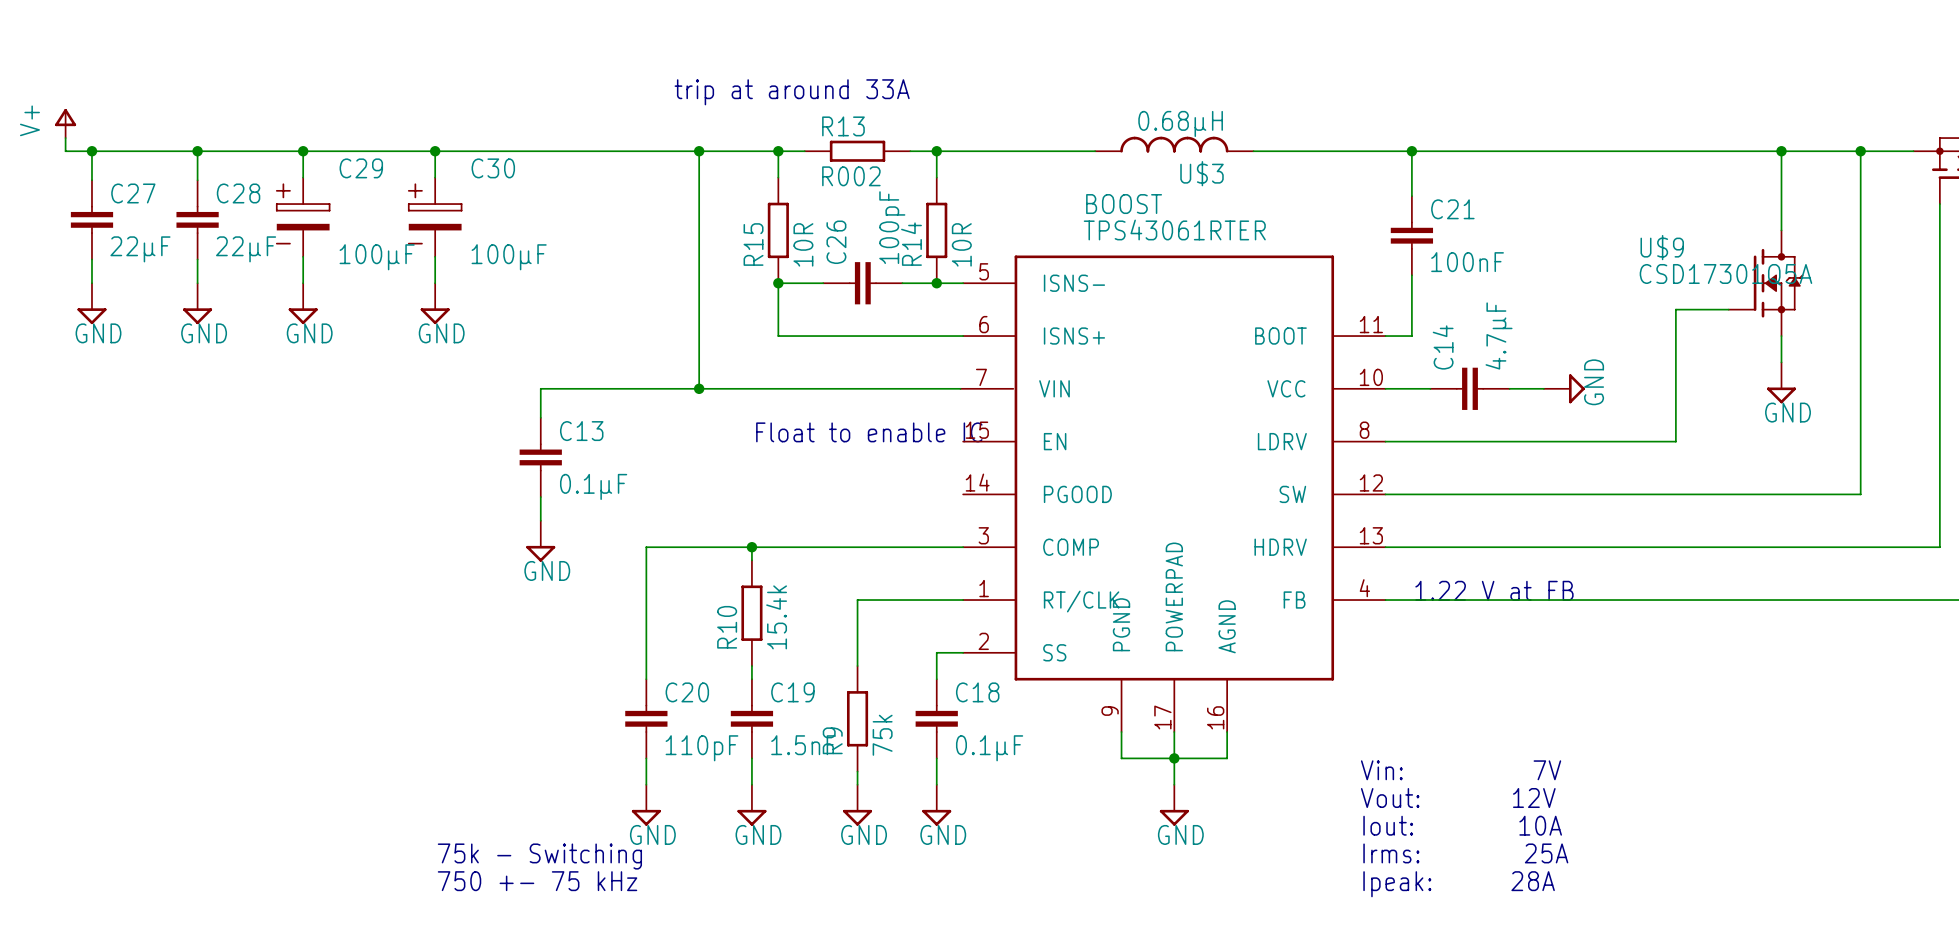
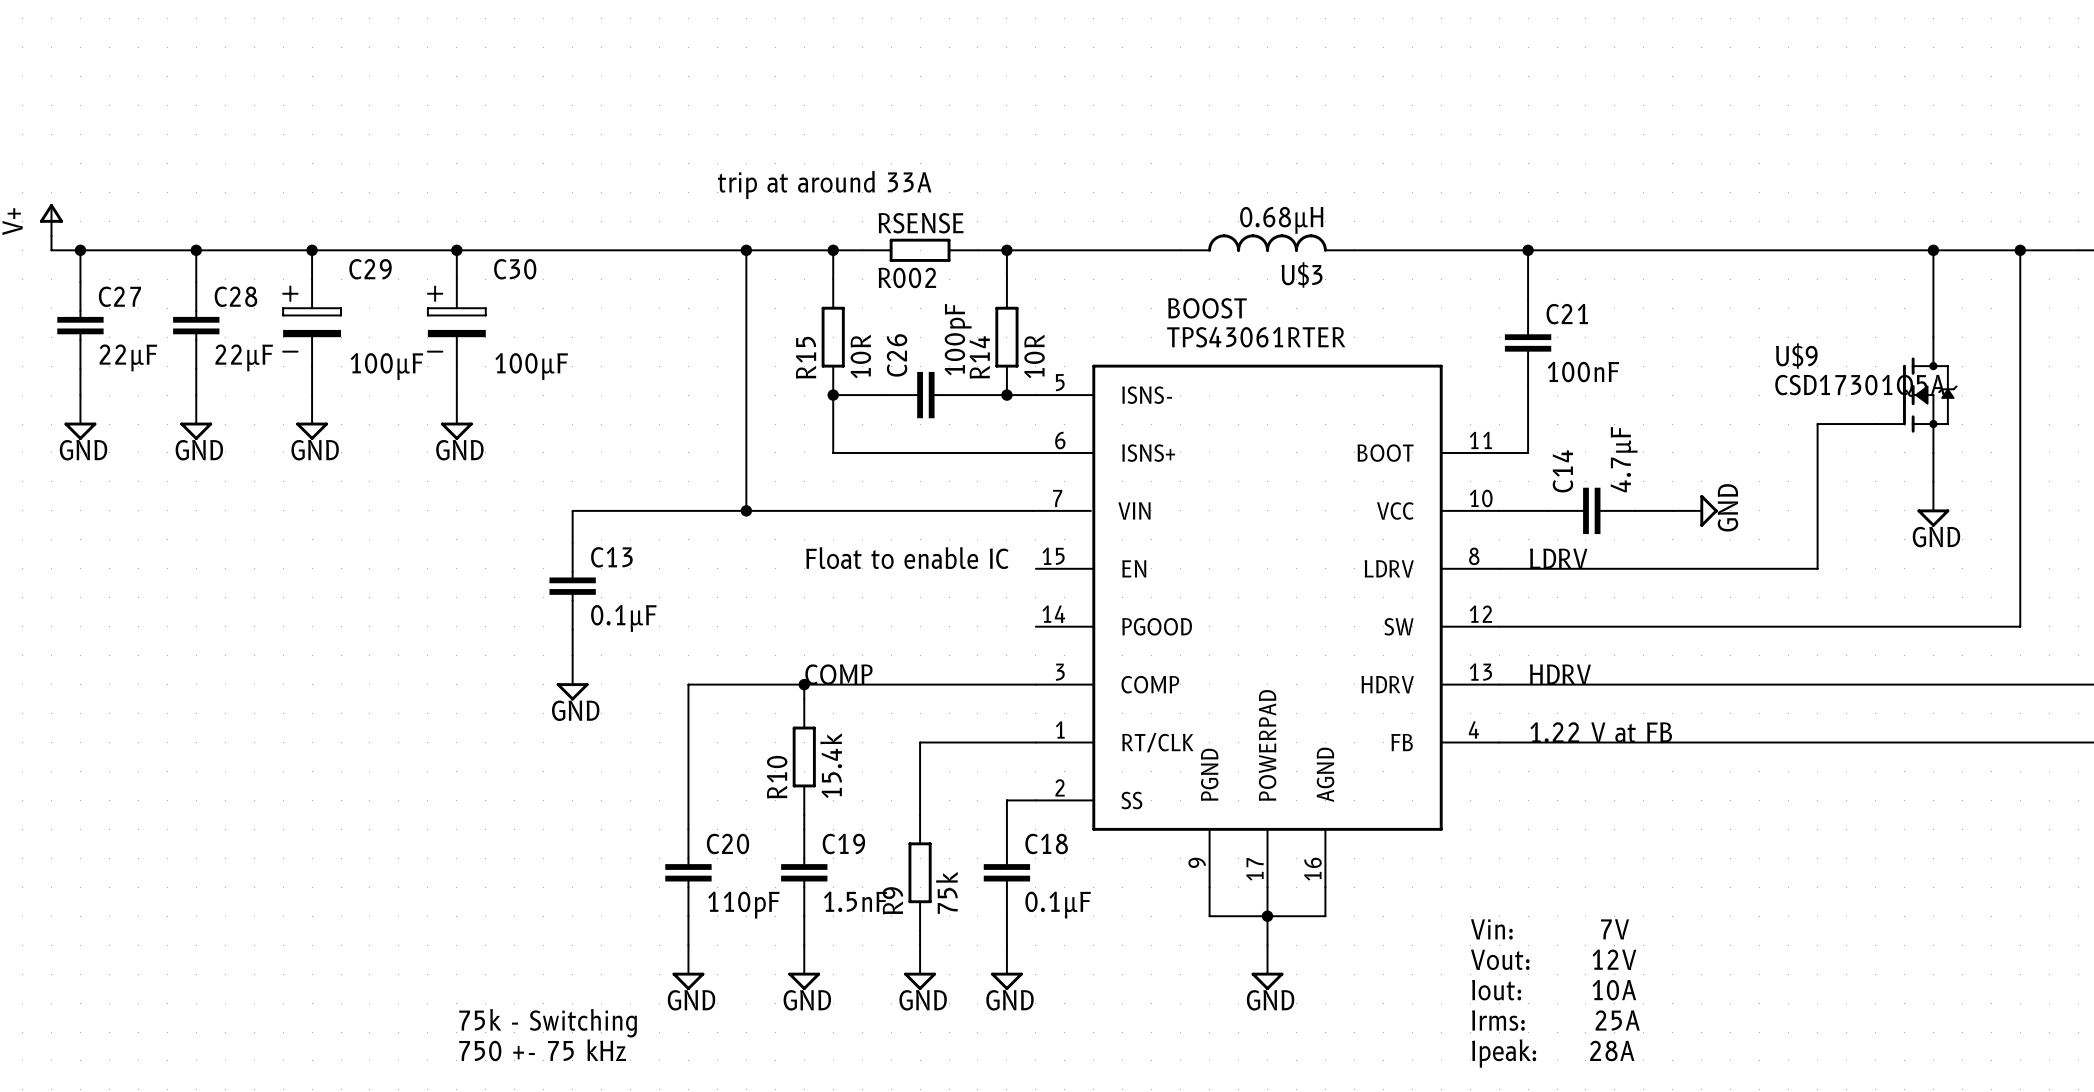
R13 name: R13 (843, 126) -> RSENSE (921, 223)
label: none -> LDRV (1558, 558)
label: none -> COMP (838, 674)
label: none -> HDRV (1560, 674)

